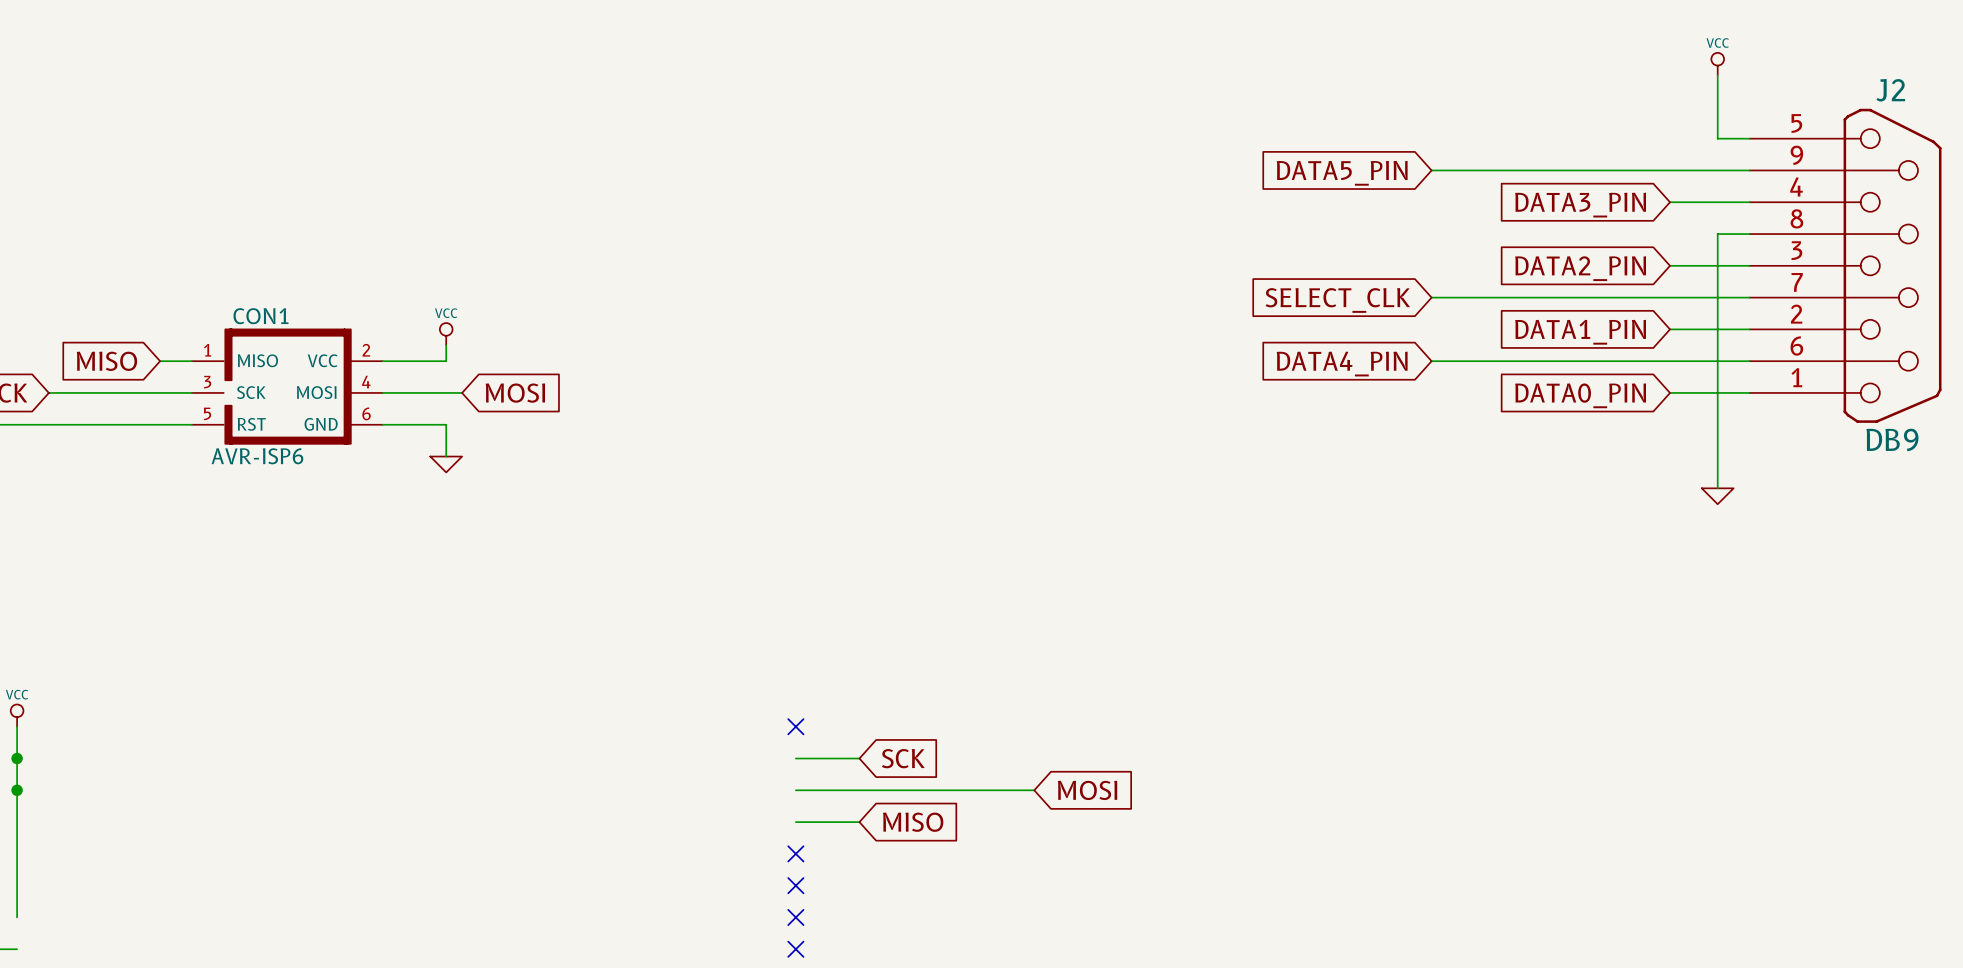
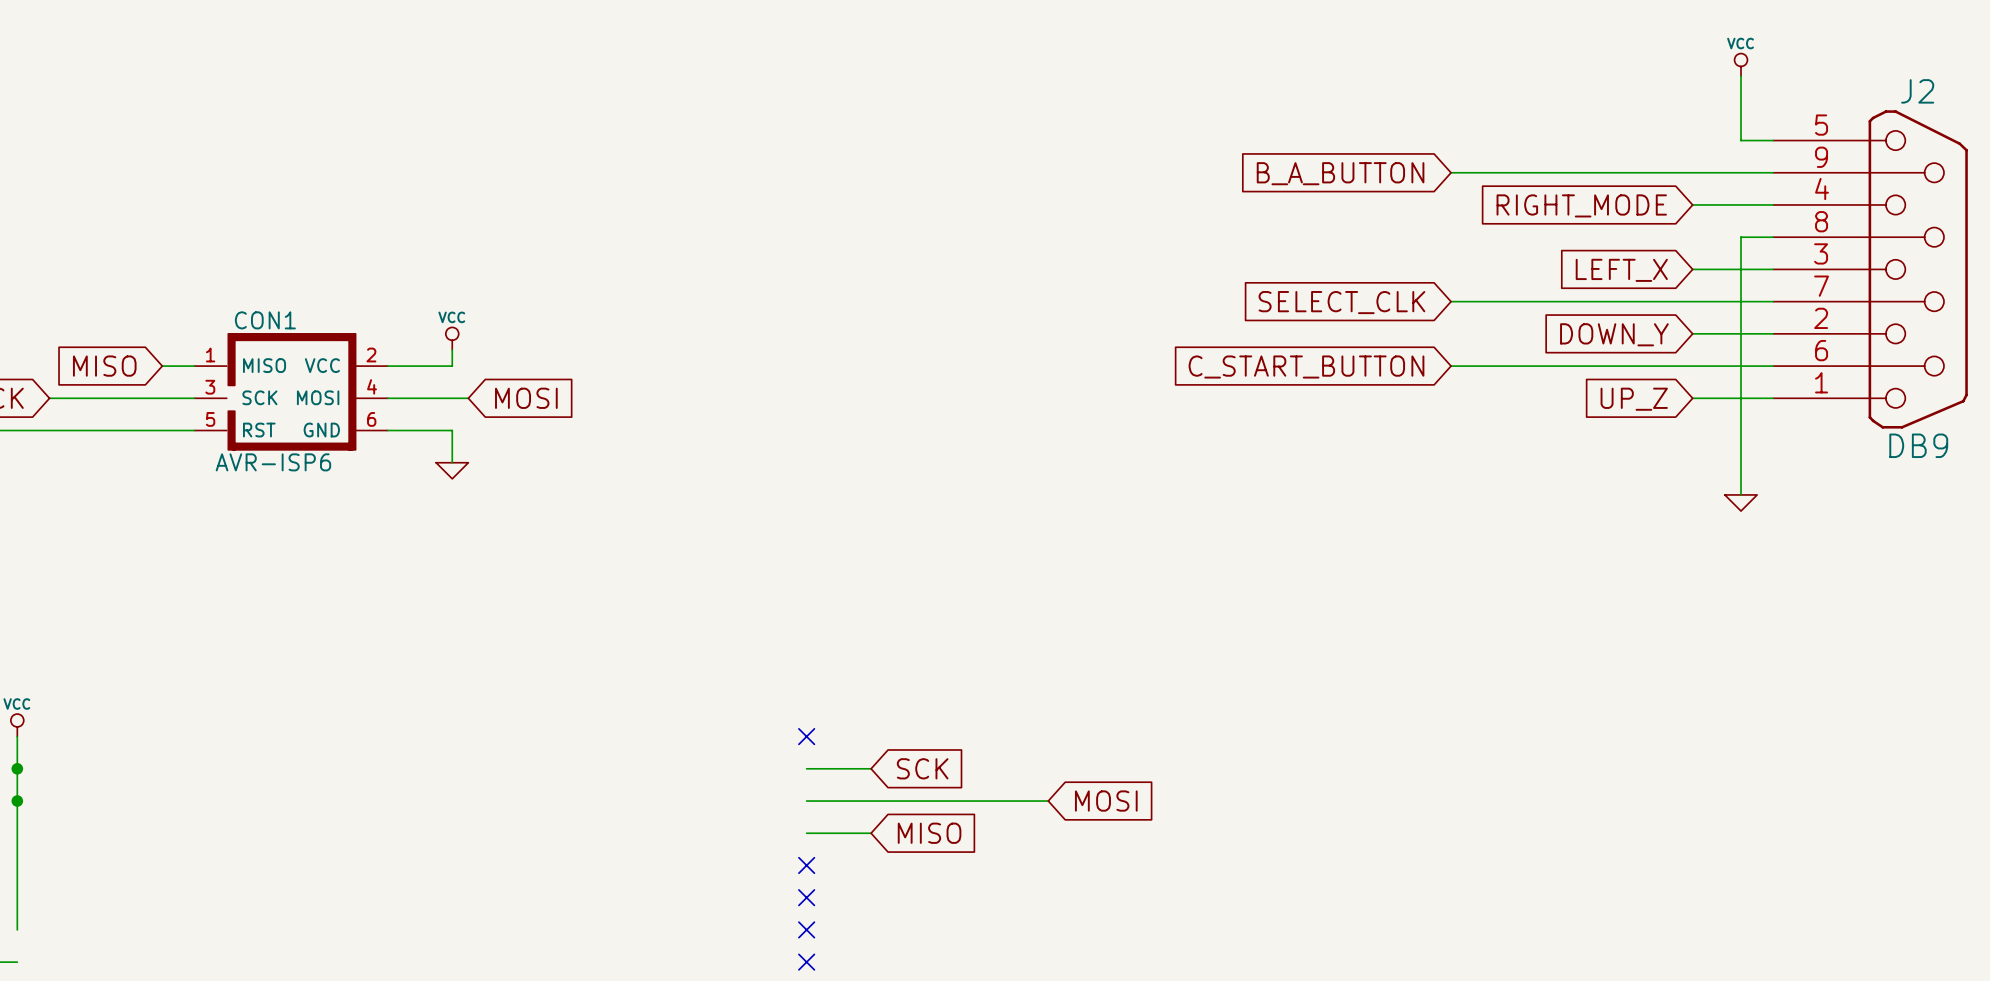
global label: DATA5_PIN (1342, 173) -> B_A_BUTTON (1340, 173)
global label: DATA3_PIN (1580, 205) -> RIGHT_MODE (1581, 205)
global label: DATA2_PIN (1580, 268) -> LEFT_X (1621, 270)
global label: DATA1_PIN (1580, 332) -> DOWN_Y (1614, 334)
global label: DATA4_PIN (1342, 364) -> C_START_BUTTON (1306, 367)
global label: DATA0_PIN (1580, 395) -> UP_Z (1634, 399)

